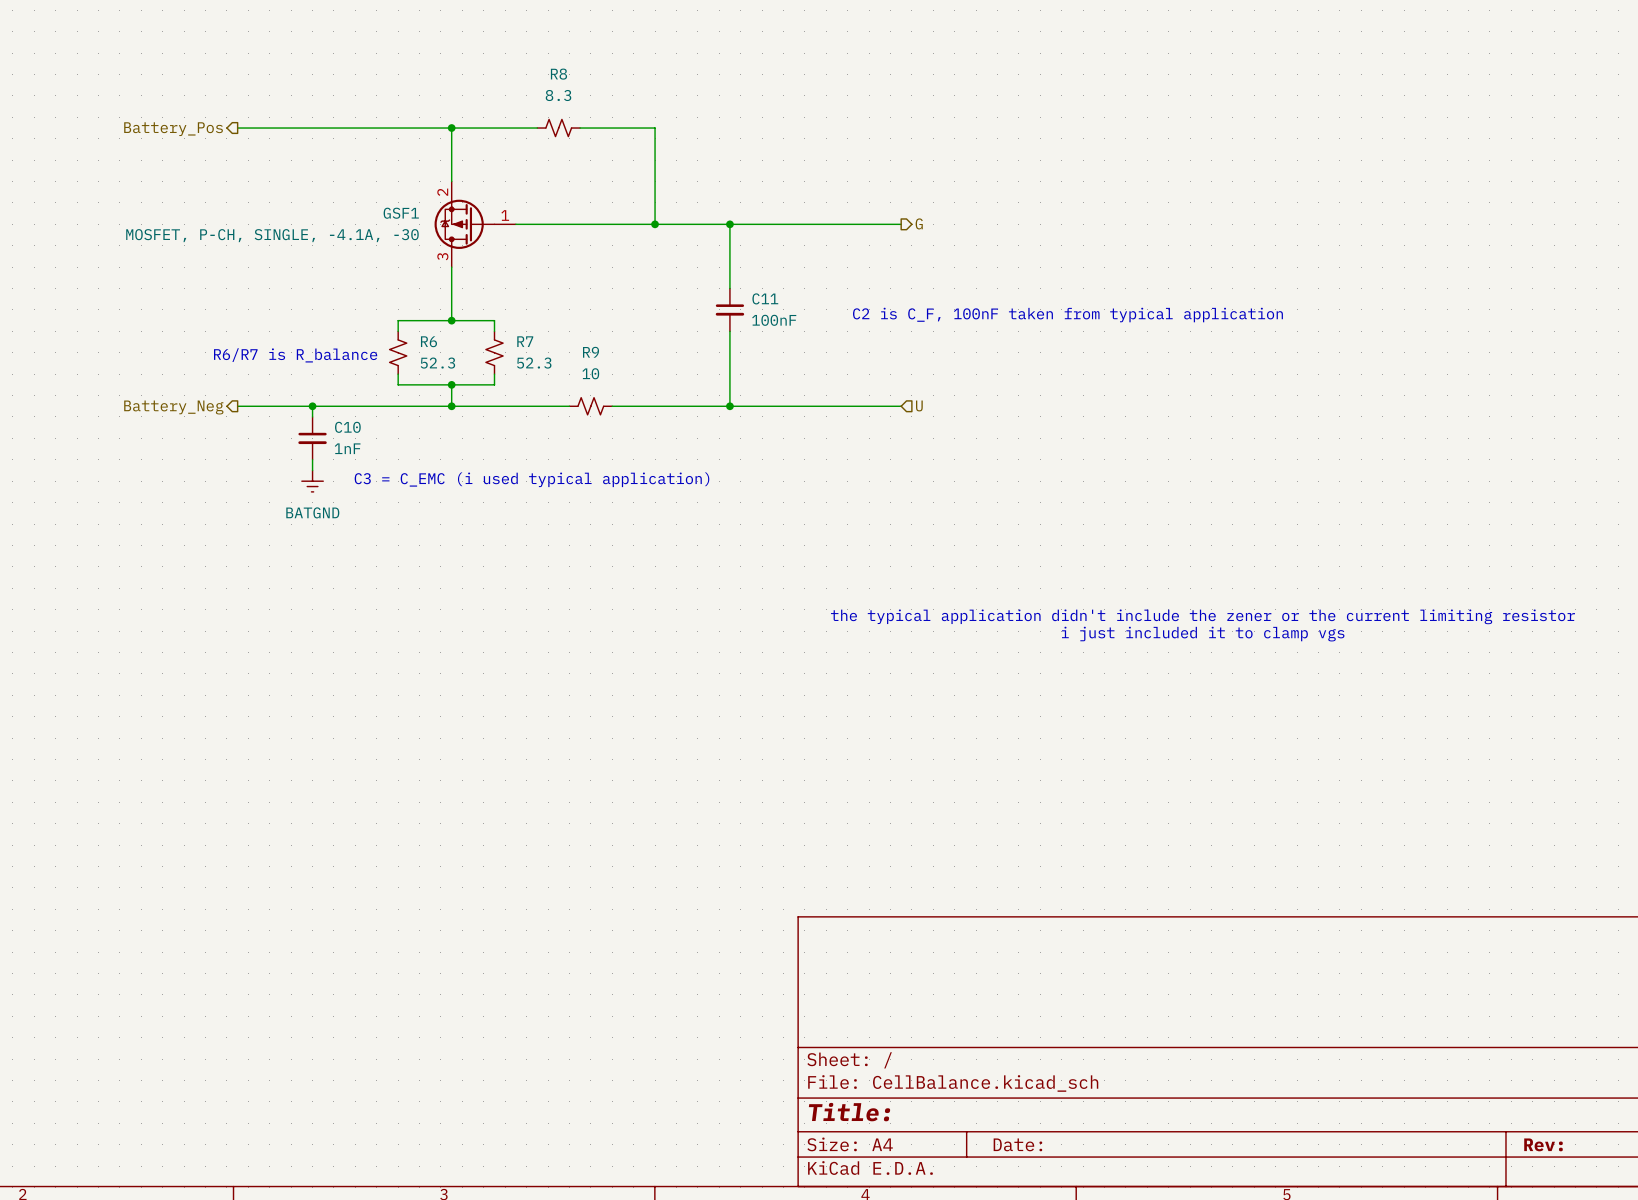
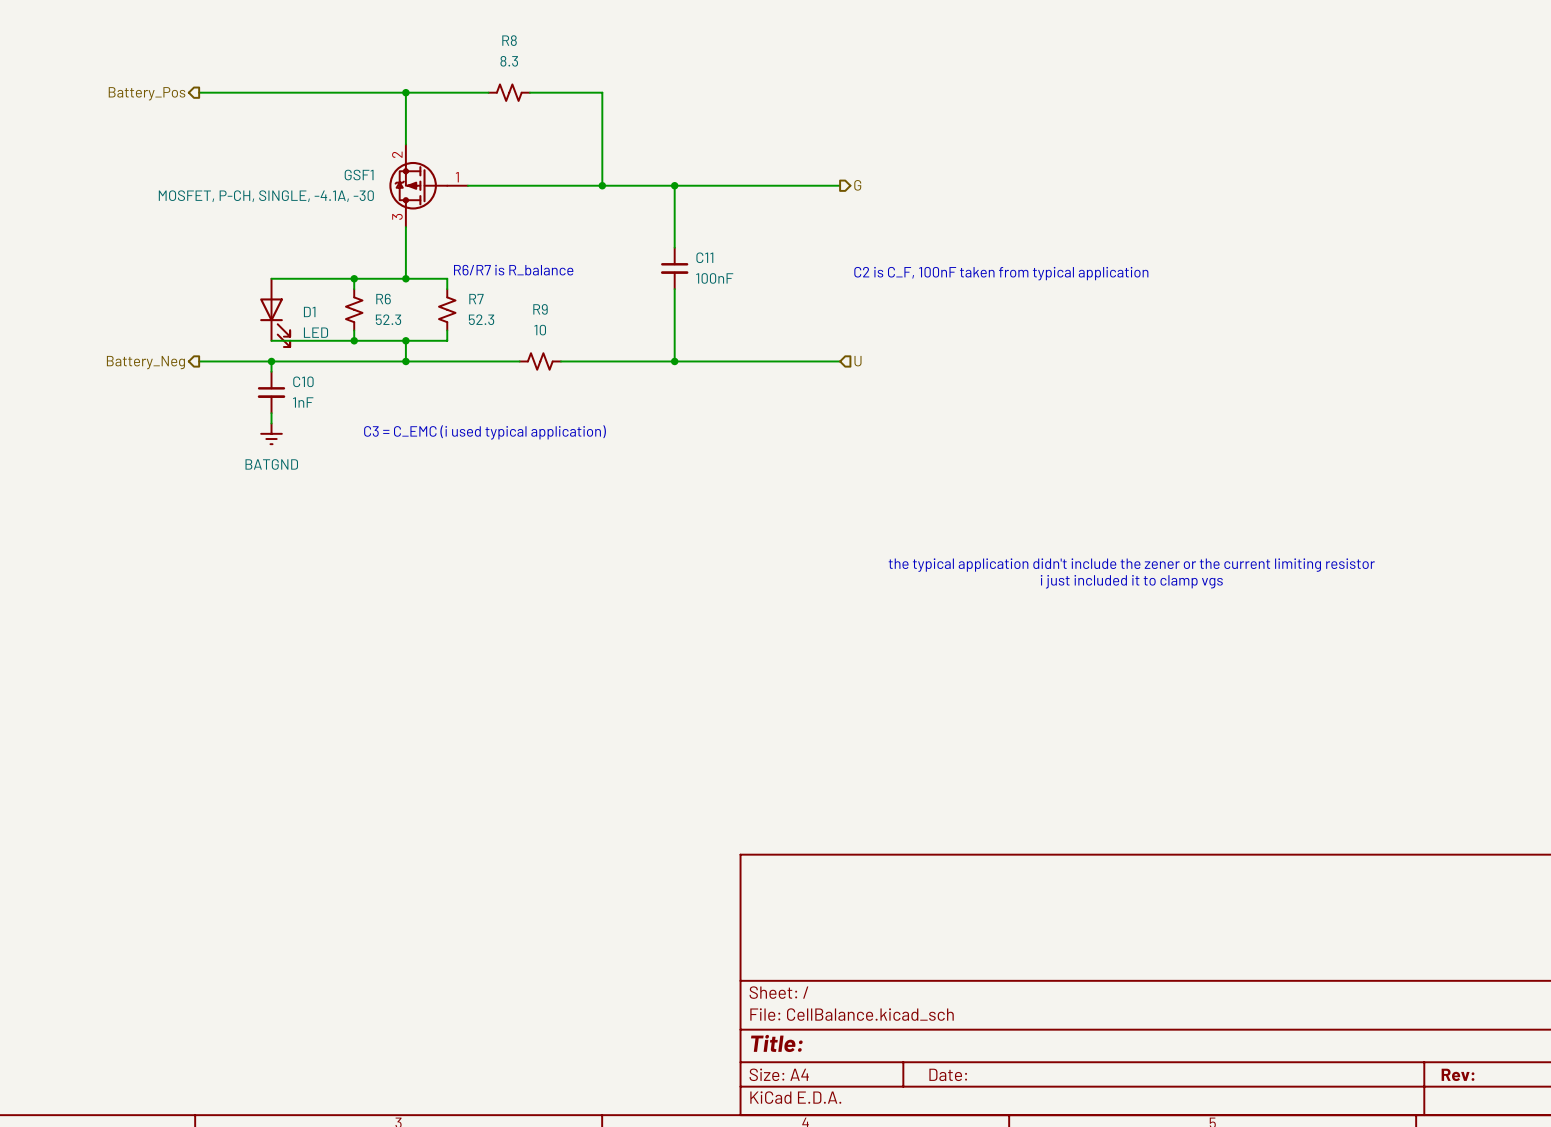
text: none -> R6/R7 is R_balance (513, 270)
wire: none -> (271, 278) (354, 278)
junction: none -> (354, 278)
text: R6/R7 is R_balance (295, 355) -> none
D1: none -> LED (275, 312)
wire: none -> (271, 340) (354, 340)
junction: none -> (354, 340)

